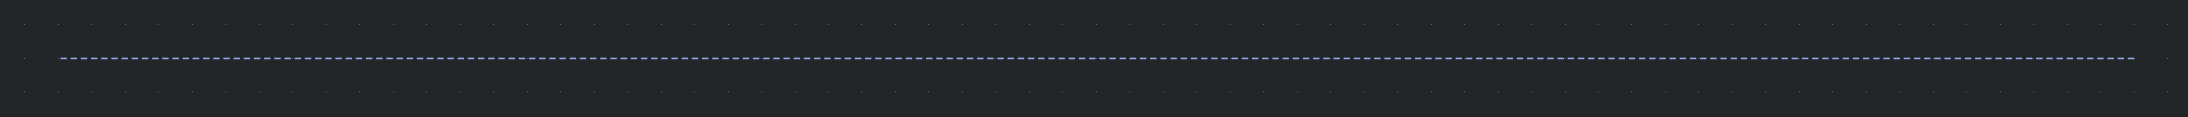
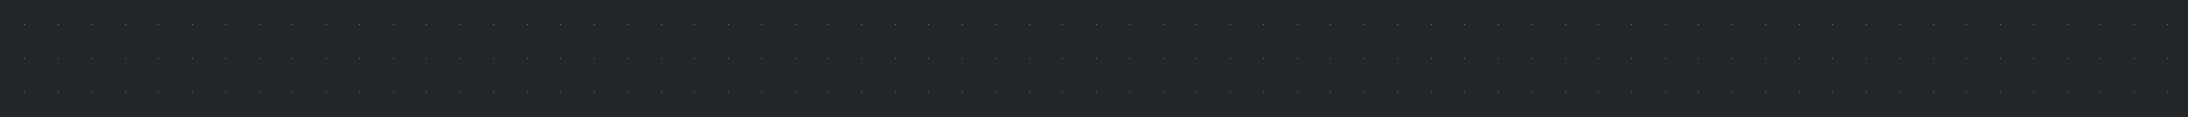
line: (58, 58) (2134, 58) -> none

